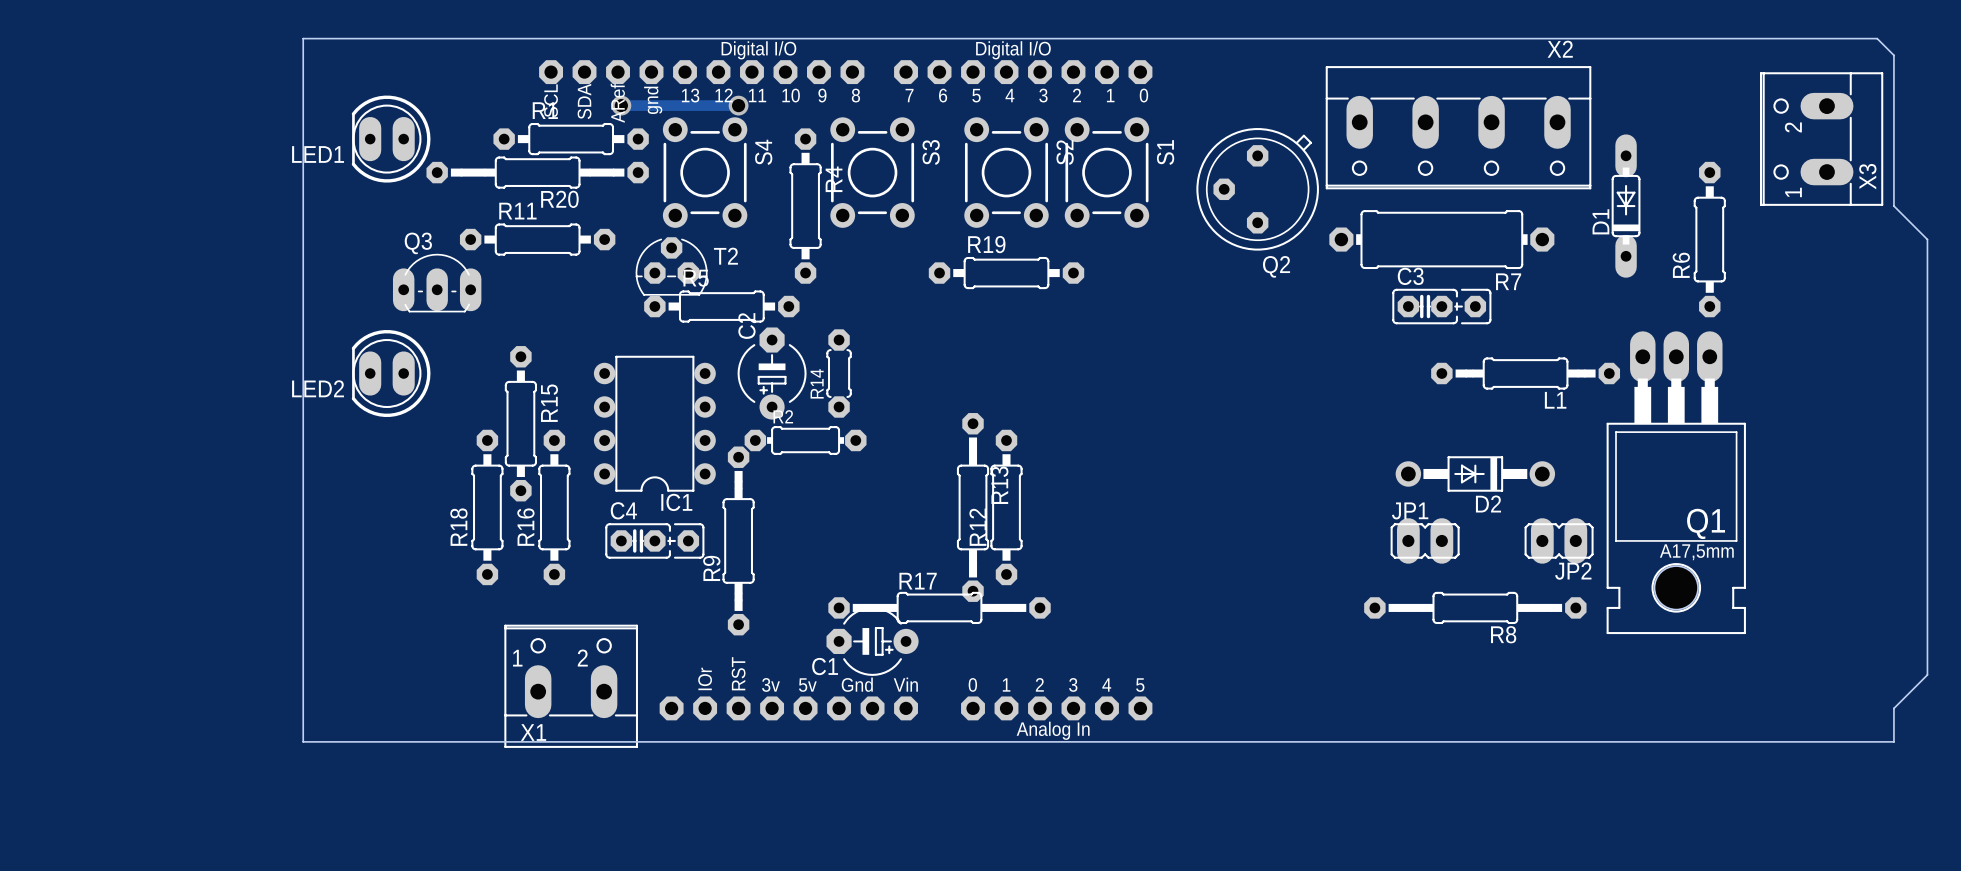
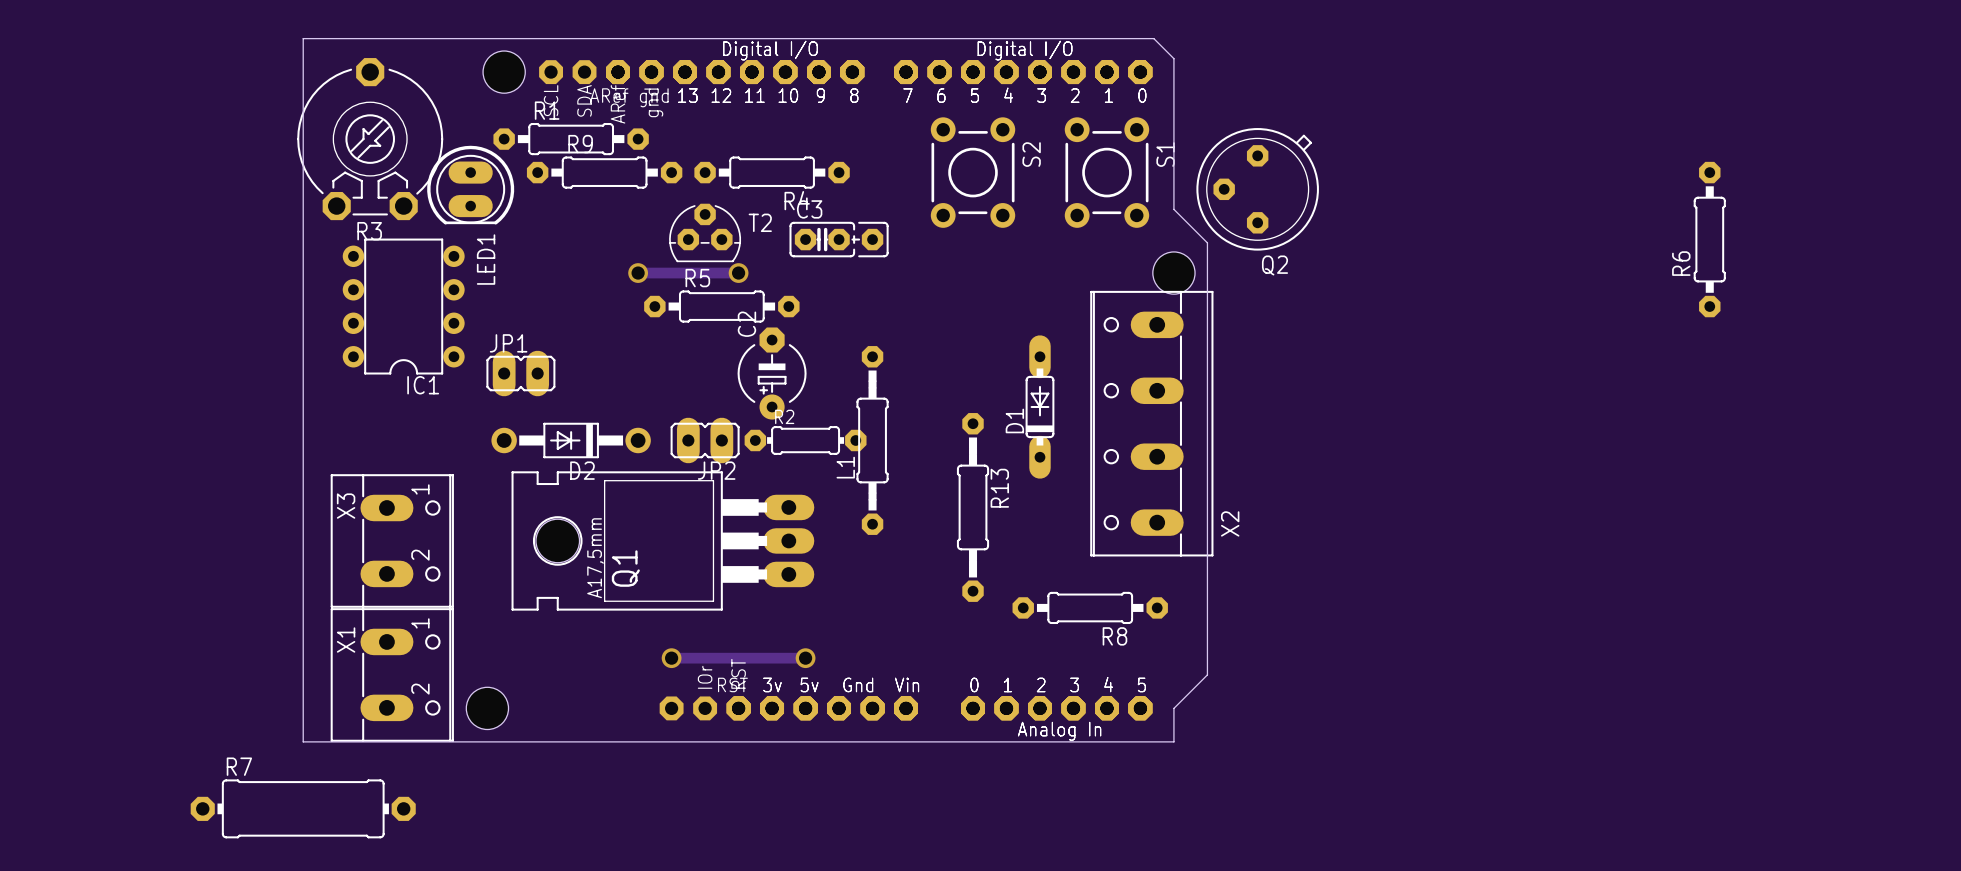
board edge: (303, 38) (1877, 38) (1893, 55) (1893, 206) (1927, 239) (1927, 674) (1893, 708) (1893, 741) (303, 741) (303, 38) -> none
X3 footprint: [1760, 72, 1884, 206] -> [330, 474, 454, 608]
track: (621, 105) (738, 105) -> none
via: (621, 105) -> none
via: (738, 105) -> none
X2 rotation: 0° (1458, 127) -> 90° clockwise (1151, 423)
X2 position: (1458, 127) -> (1151, 423)
R3: none -> (370, 139)
LED1 rotation: 0° (391, 139) -> 90° counterclockwise (470, 185)
LED1 position: (391, 139) -> (470, 185)
R20: (537, 172) -> none
S4: (705, 172) -> none
S3: (872, 172) -> none
S2 position: (1006, 172) -> (973, 172)
X3 name position: X3 (1867, 176) -> X3 (346, 506)
R4 rotation: 0° (805, 206) -> 90° clockwise (772, 172)
D1 position: (1626, 206) -> (1039, 407)
R11: (537, 239) -> none
R7 position: (1441, 239) -> (303, 808)
T2 position: (671, 266) -> (705, 232)
track: none -> (638, 273) (738, 273)
via: none -> (638, 273)
via: none -> (738, 273)
R19: (1006, 273) -> none
R7 name position: R7 (1508, 281) -> R7 (239, 766)
Q3: (437, 283) -> none
C3 position: (1441, 306) -> (839, 239)
Q1 footprint: [1606, 331, 1746, 635] -> [511, 471, 815, 611]
LED2: (391, 373) -> none
R14: (839, 373) -> none
L1 rotation: 0° (1525, 373) -> 90° clockwise (872, 440)
L1 position: (1525, 373) -> (872, 440)
part: none -> (755, 390)
R15: (520, 423) -> none
IC1 position: (654, 423) -> (403, 306)
R9 footprint: [722, 446, 755, 636] -> [526, 156, 683, 189]
D2 position: (1475, 473) -> (571, 440)
R18: (487, 507) -> none
R16: (554, 507) -> none
R12: (1006, 507) -> none
Q1 name position: Q1 (1706, 523) -> Q1 (625, 568)
C4: (654, 540) -> none
JP1 position: (1425, 540) -> (520, 373)
JP2 position: (1559, 540) -> (705, 440)
R9 name position: R9 (711, 568) -> R9 (580, 144)
R8 footprint: [1364, 591, 1587, 625] -> [1012, 591, 1168, 625]
R17: (939, 607) -> none
X1 footprint: [504, 624, 638, 748] -> [330, 608, 454, 742]
C1: (872, 641) -> none
track: none -> (671, 658) (805, 658)
via: none -> (671, 658)
via: none -> (805, 658)
X1 name position: X1 (533, 732) -> X1 (346, 640)

